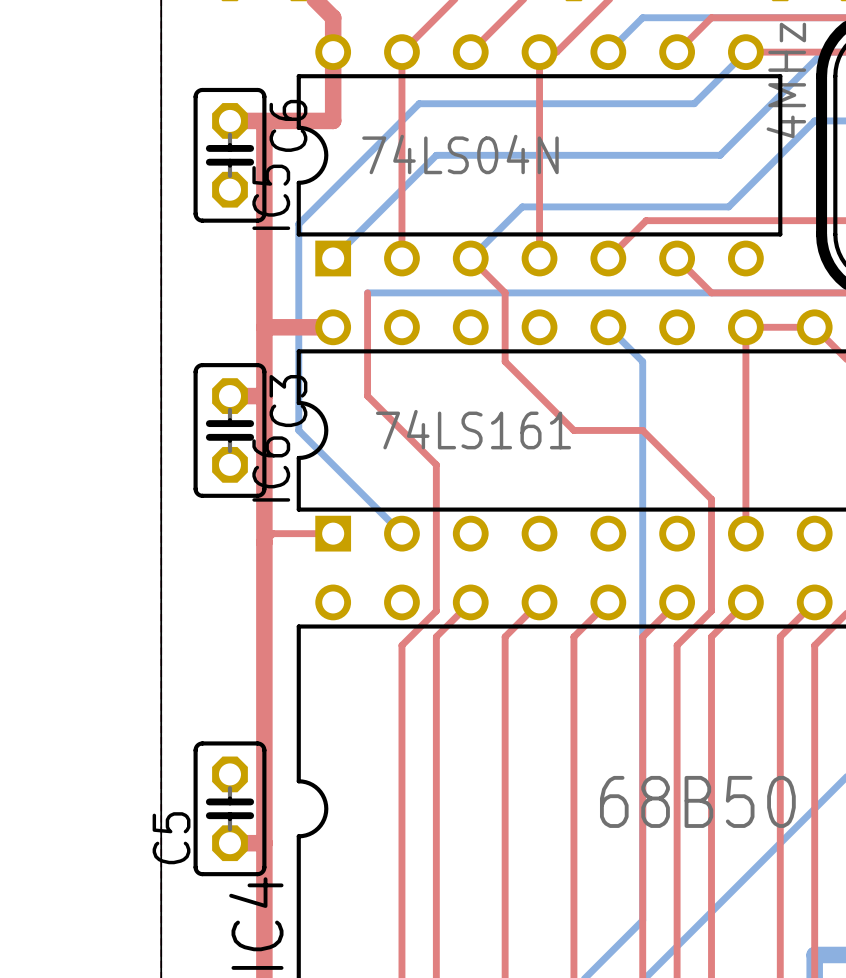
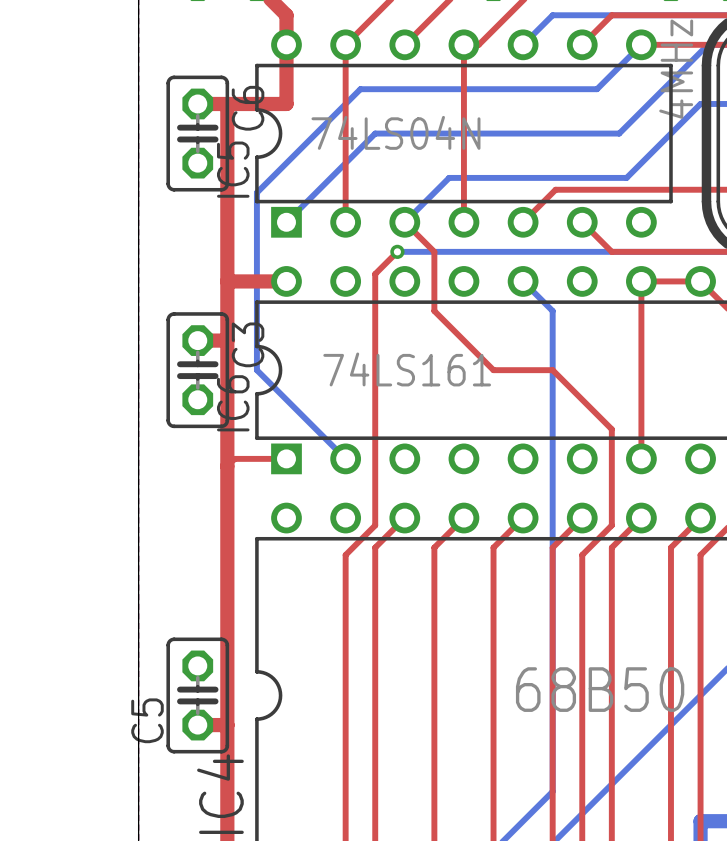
top track: (367, 292) (367, 396) (436, 464) -> (397, 251) (375, 274) (375, 399)
bottom track: (367, 292) (462, 292) -> none
via: none -> (397, 251)

